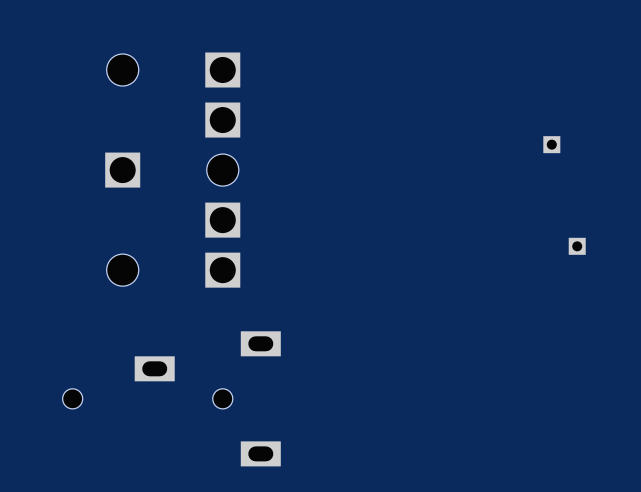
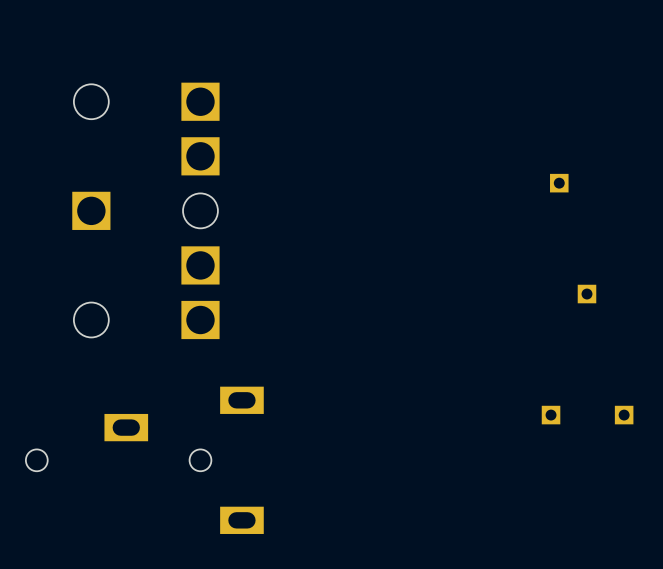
part: none -> (551, 415)
part: none -> (624, 415)

